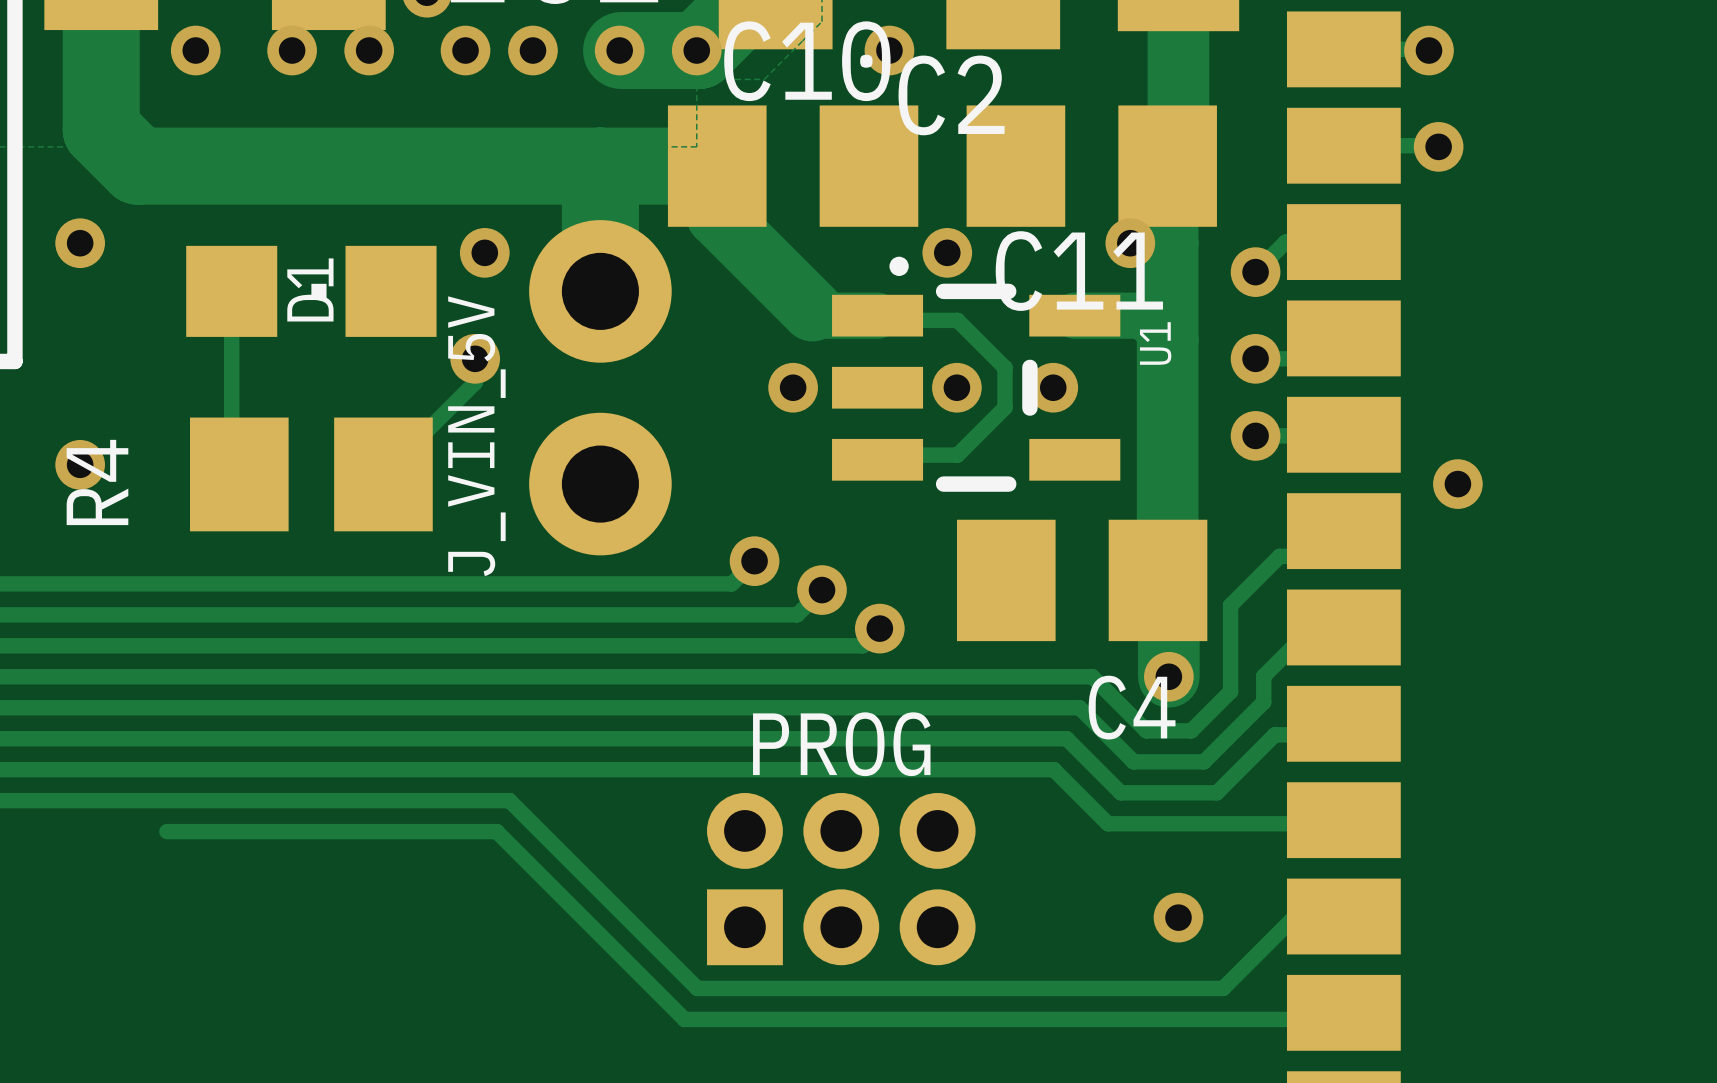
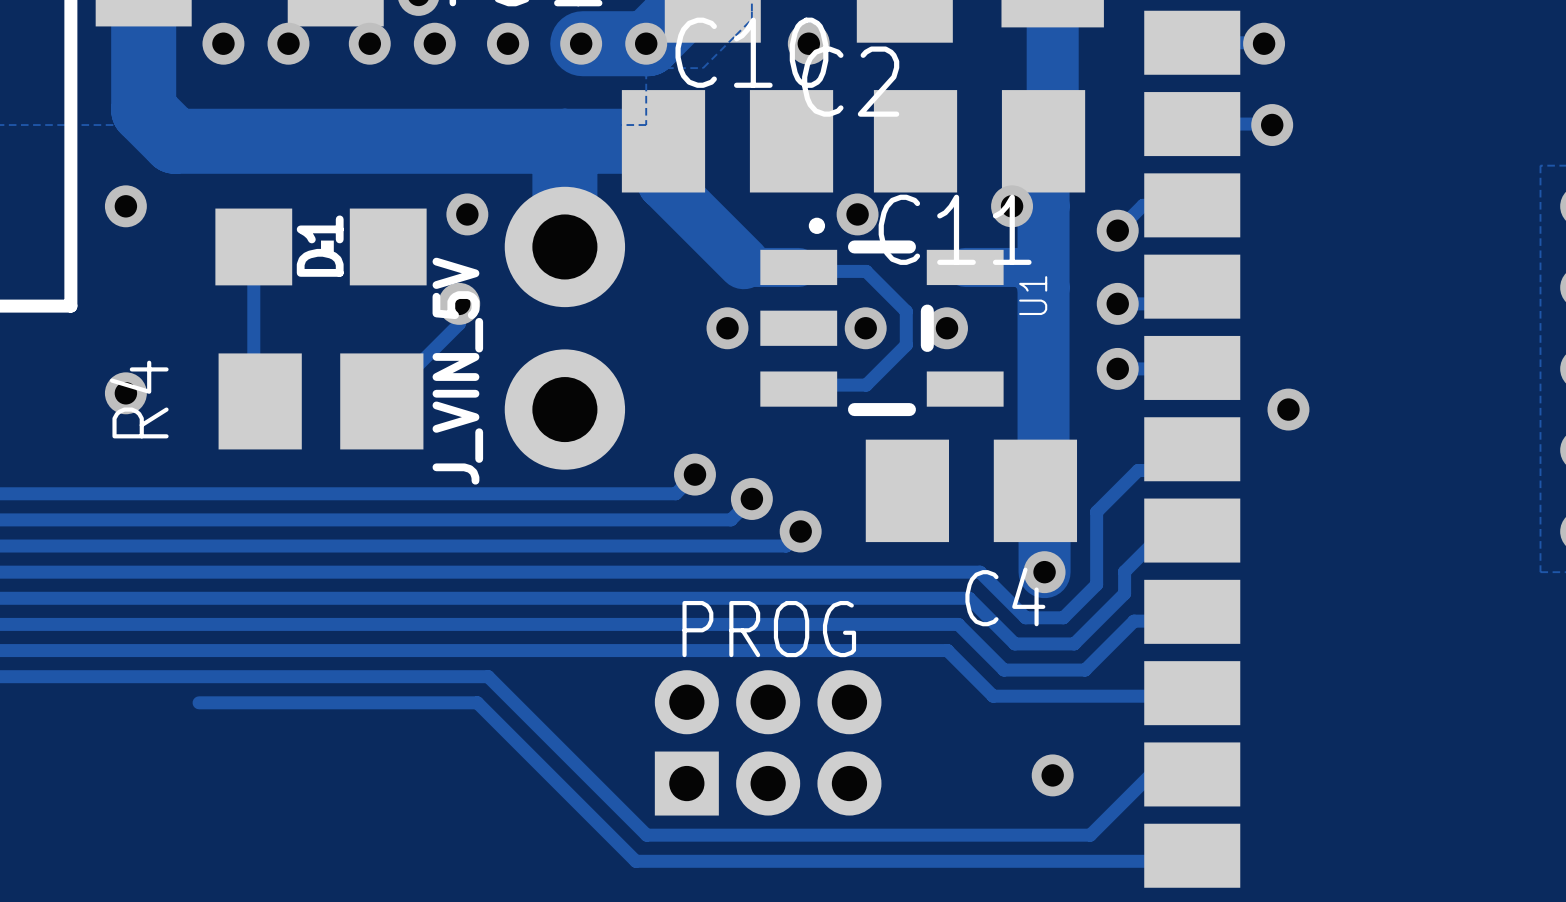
via position: (292, 50) -> (288, 43)
via position: (465, 50) -> (434, 43)

